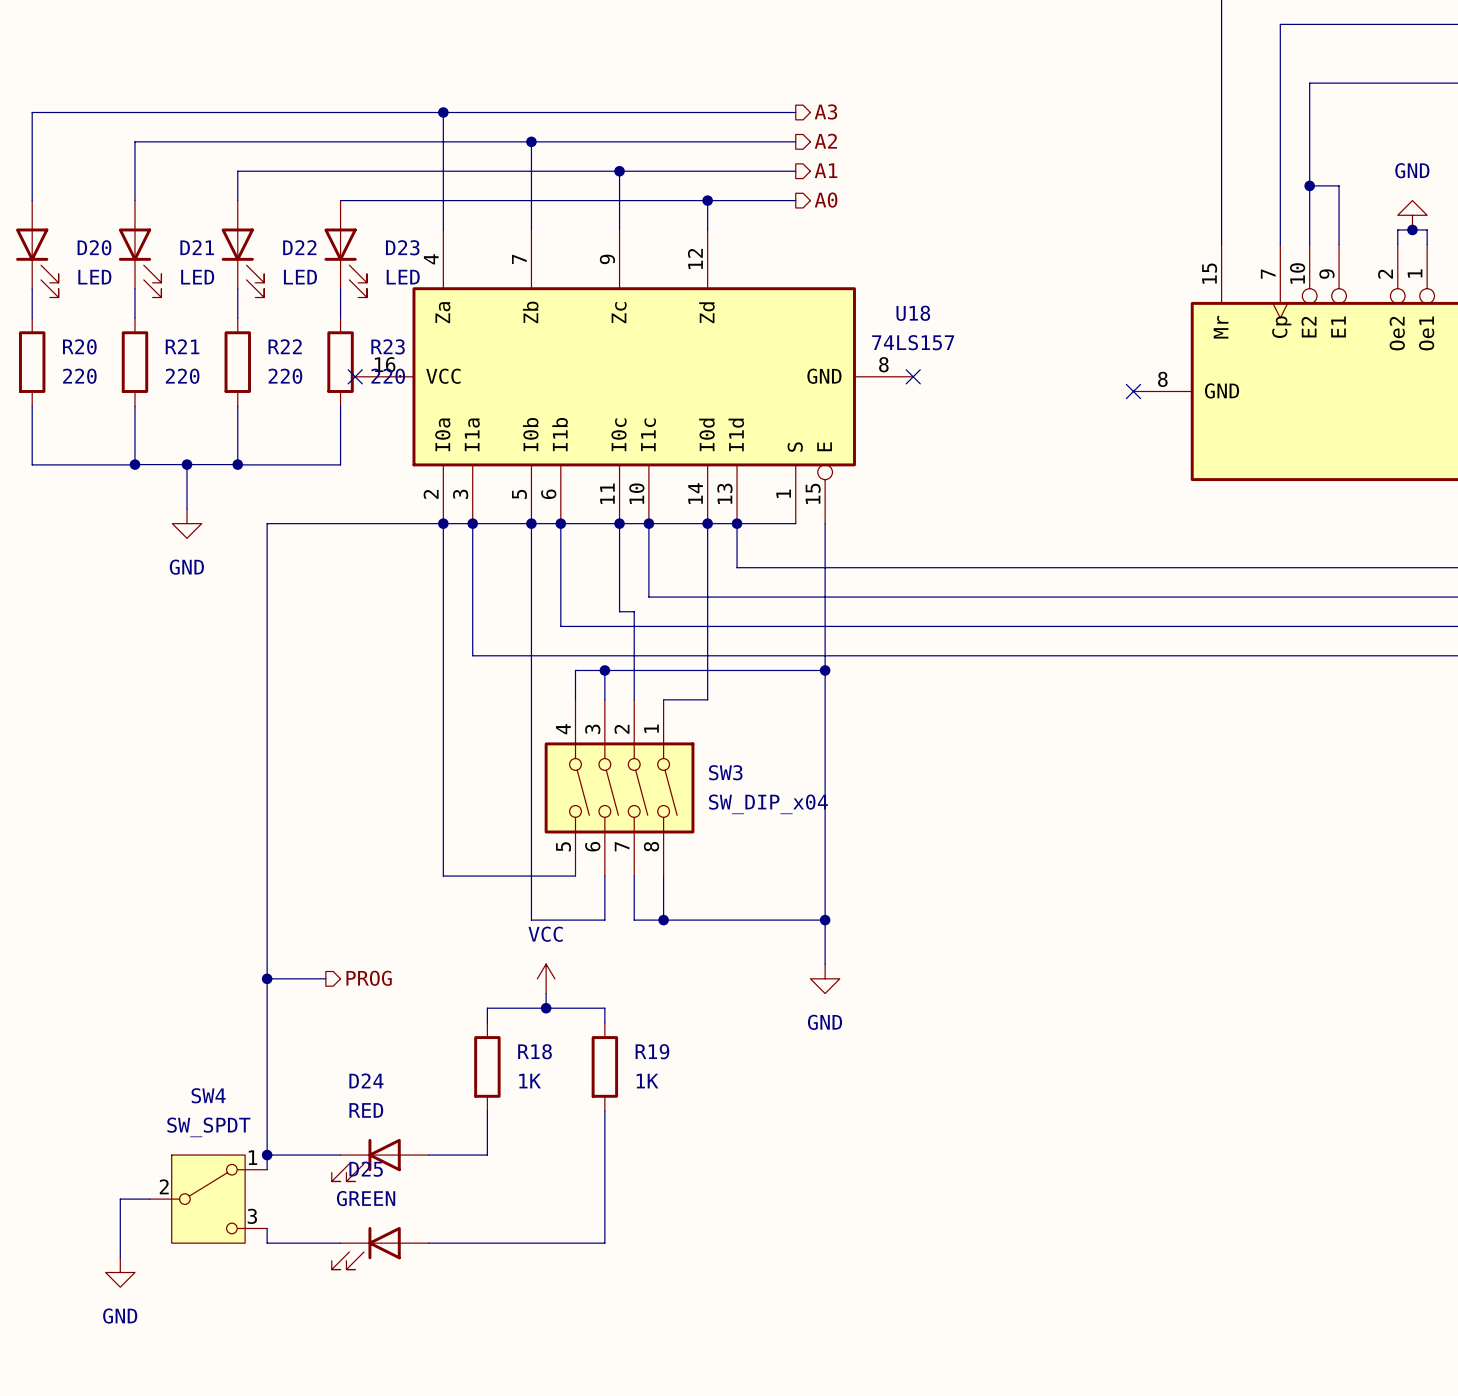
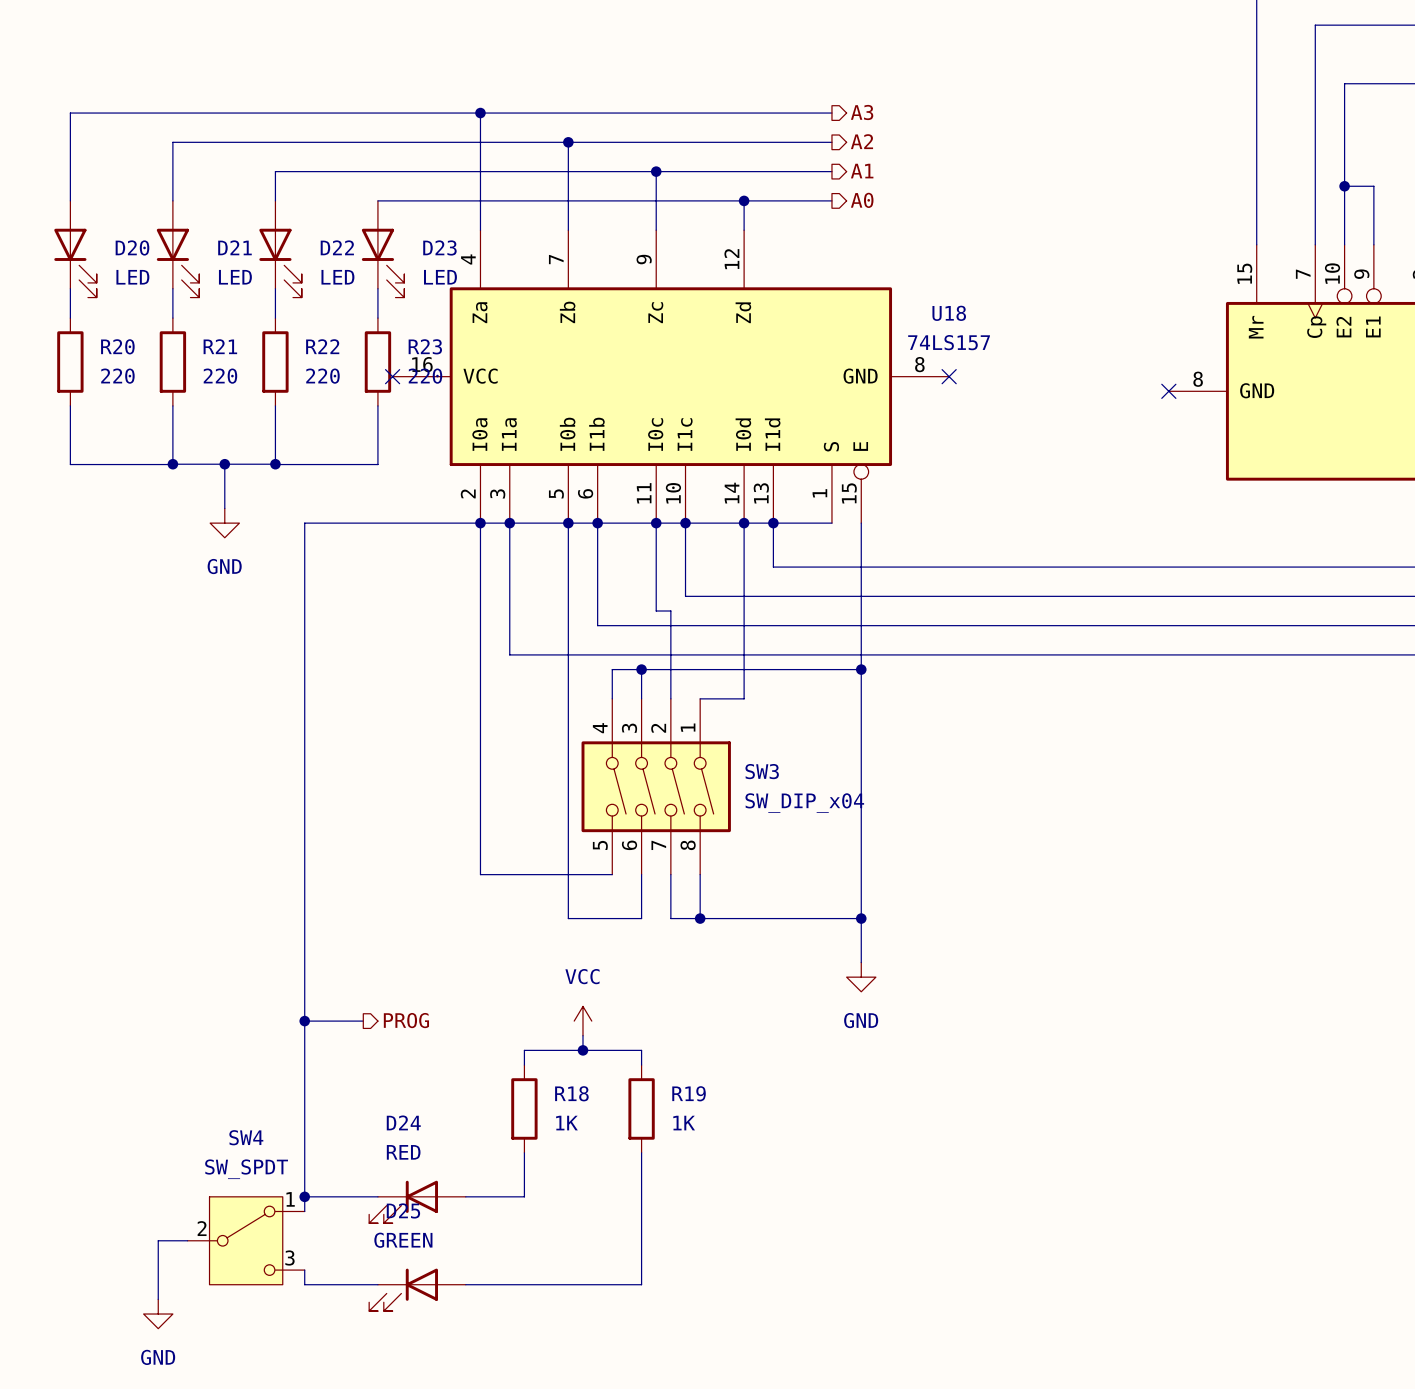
wire: (267, 978) (325, 978) -> (304, 1021) (363, 1021)
junction position: (267, 978) -> (304, 1021)
hierarchical label position: PROG (369, 978) -> PROG (406, 1020)
power symbol position: VCC (546, 978) -> VCC (582, 1021)
wire: (546, 993) (546, 1008) -> (582, 1035) (582, 1050)
junction position: (546, 1008) -> (582, 1050)
wire: (487, 1022) (487, 1008) (604, 1008) (604, 1022) -> (524, 1065) (524, 1050) (641, 1050) (641, 1065)
R18 position: (487, 1066) -> (524, 1108)
R19 position: (604, 1066) -> (641, 1108)
wire: (487, 1110) (487, 1155) (428, 1155) -> (524, 1152) (524, 1196) (465, 1196)
wire: (604, 1110) (604, 1155) -> none
wire: (267, 1155) (340, 1155) -> (304, 1196) (377, 1196)
junction position: (267, 1155) -> (304, 1196)
D24 position: (380, 1160) -> (417, 1201)
wire: none -> (304, 1167) (304, 1211)
wire: (149, 1199) (120, 1199) (120, 1243) -> (187, 1240) (158, 1240)
SW4 position: (208, 1199) -> (246, 1240)
wire: (267, 1228) (267, 1243) (340, 1243) -> (304, 1270) (304, 1284) (377, 1284)
wire: (428, 1243) (604, 1243) -> (465, 1284) (641, 1284) (641, 1240)
D25 position: (380, 1248) -> (417, 1289)
wire: none -> (158, 1255) (158, 1299)
power symbol position: GND (120, 1272) -> GND (158, 1314)

